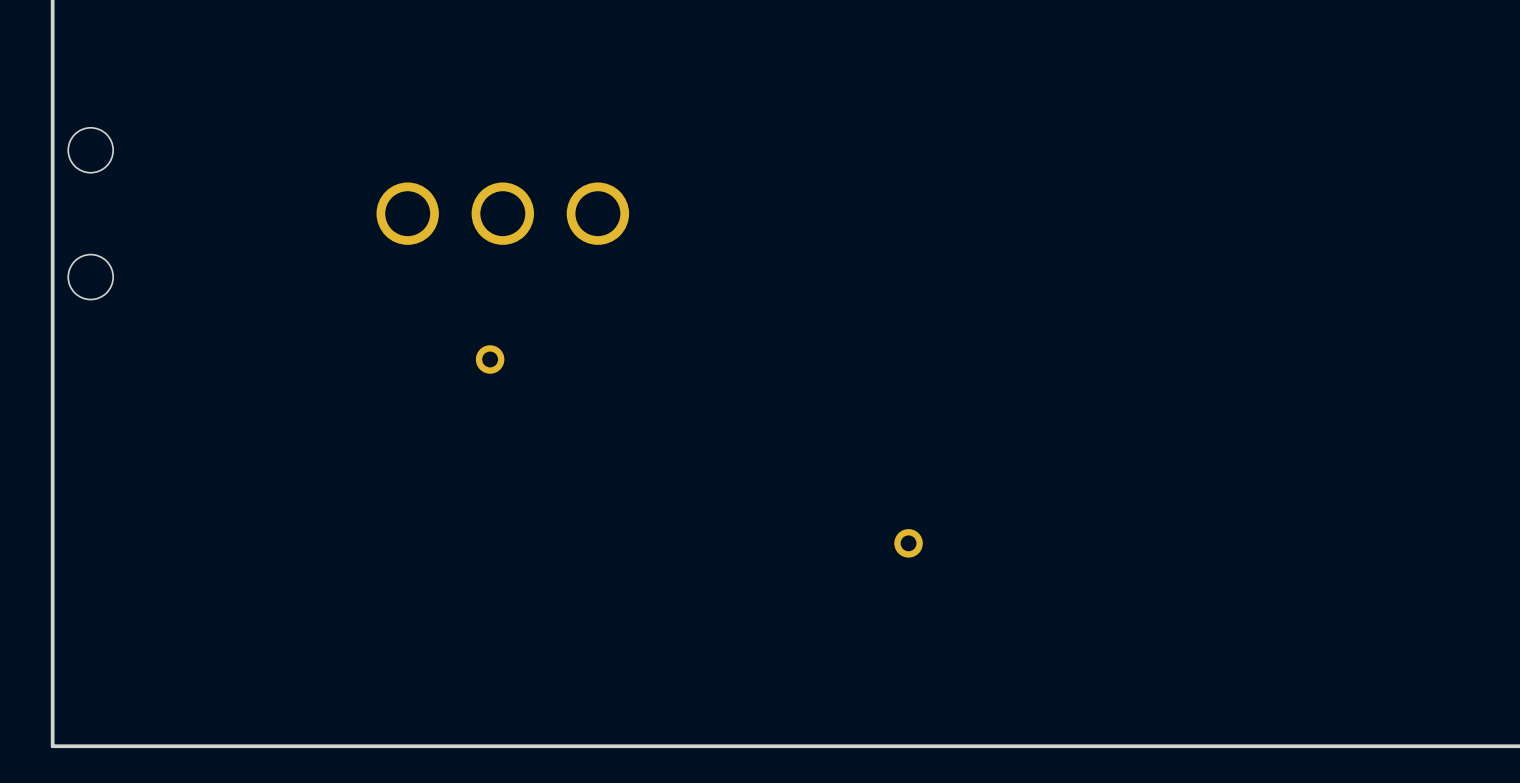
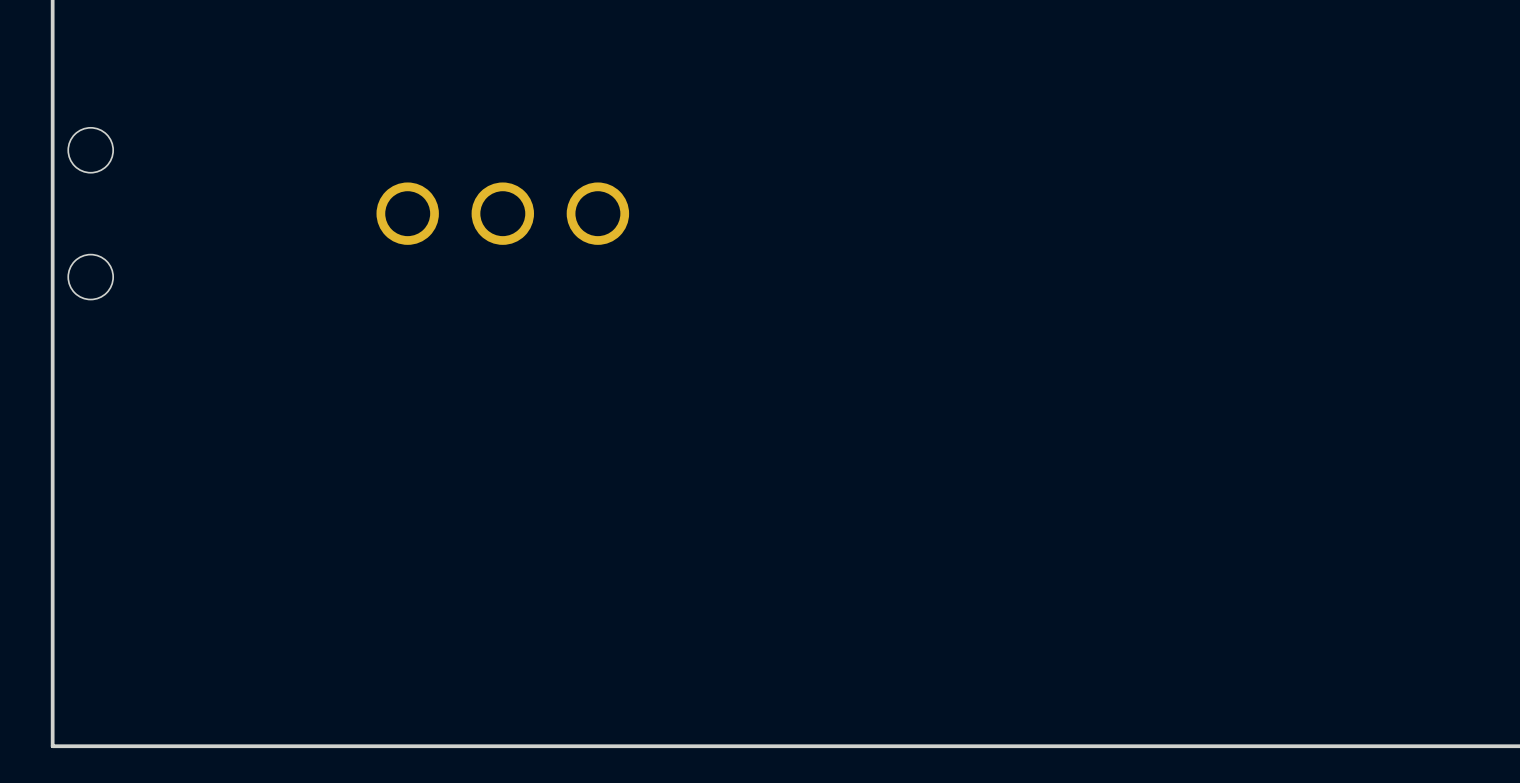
part: (490, 359) -> none
part: (908, 543) -> none

